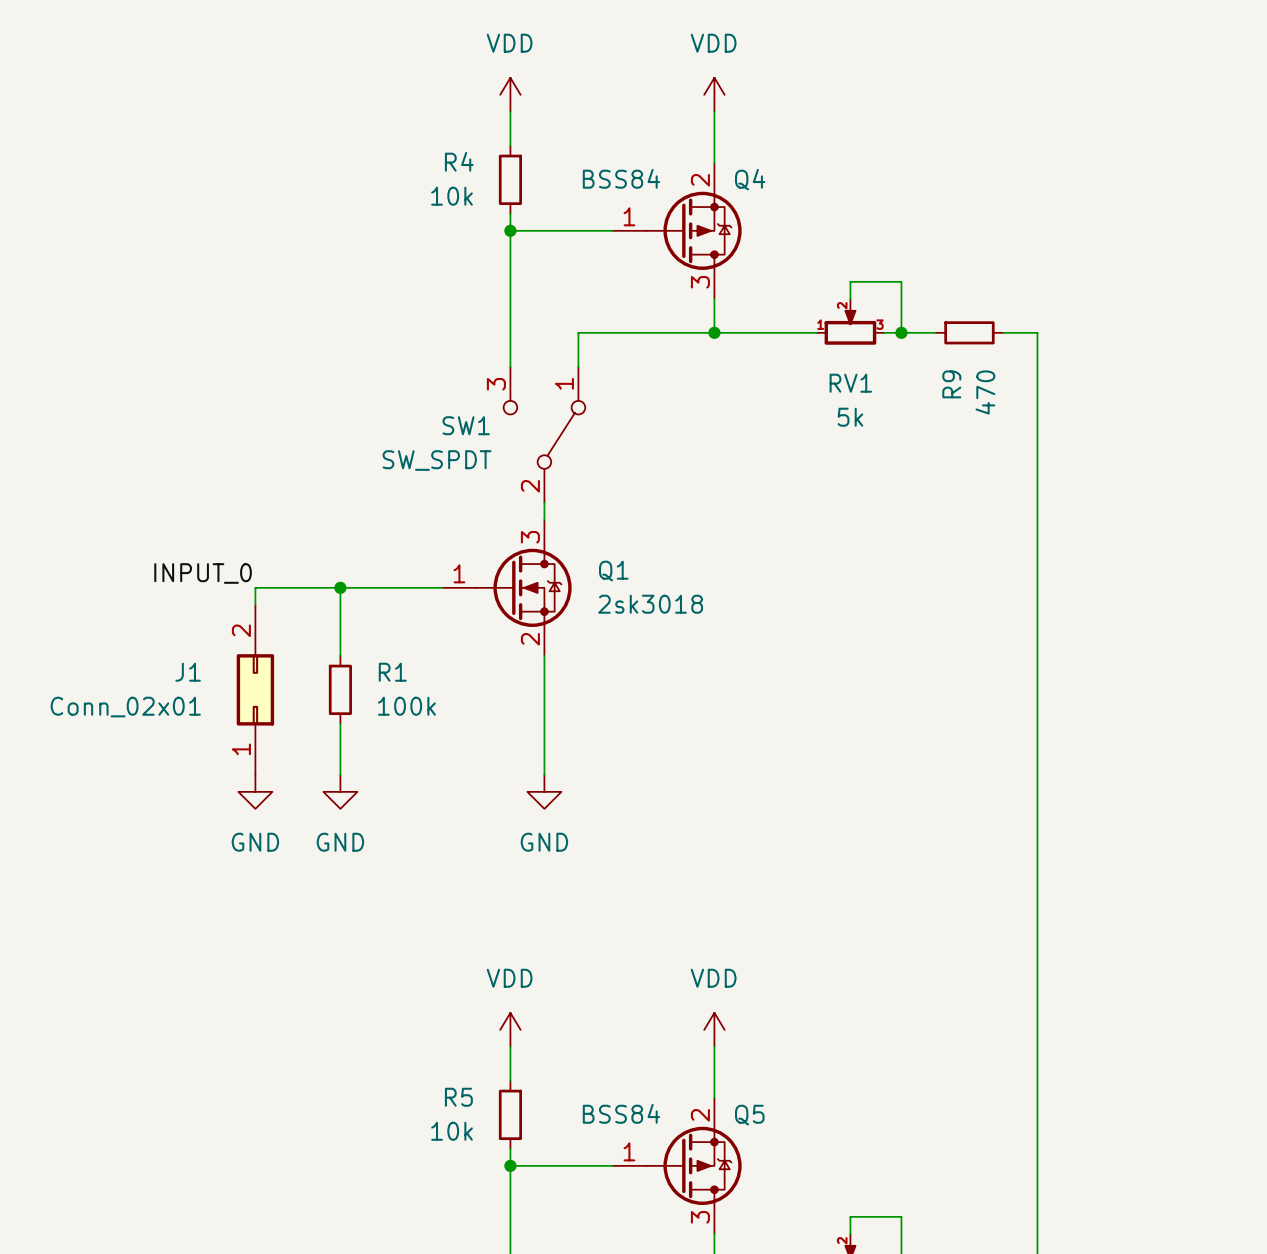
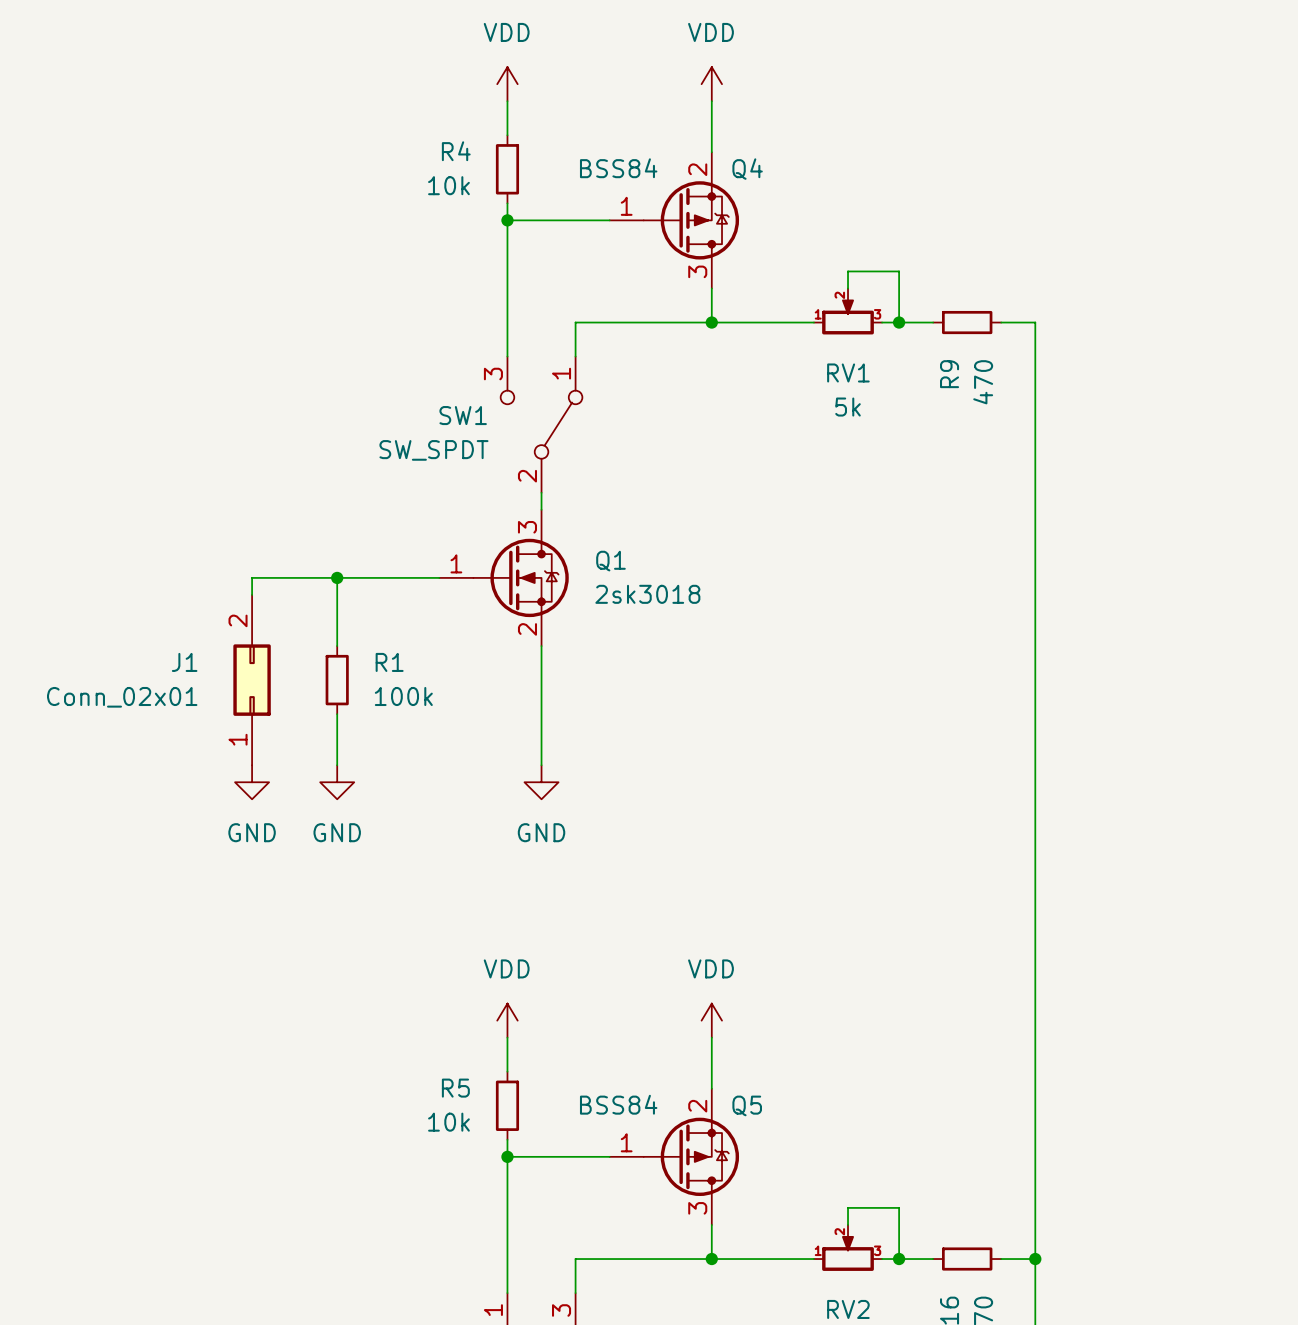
label: INPUT_0 (203, 573) -> none

